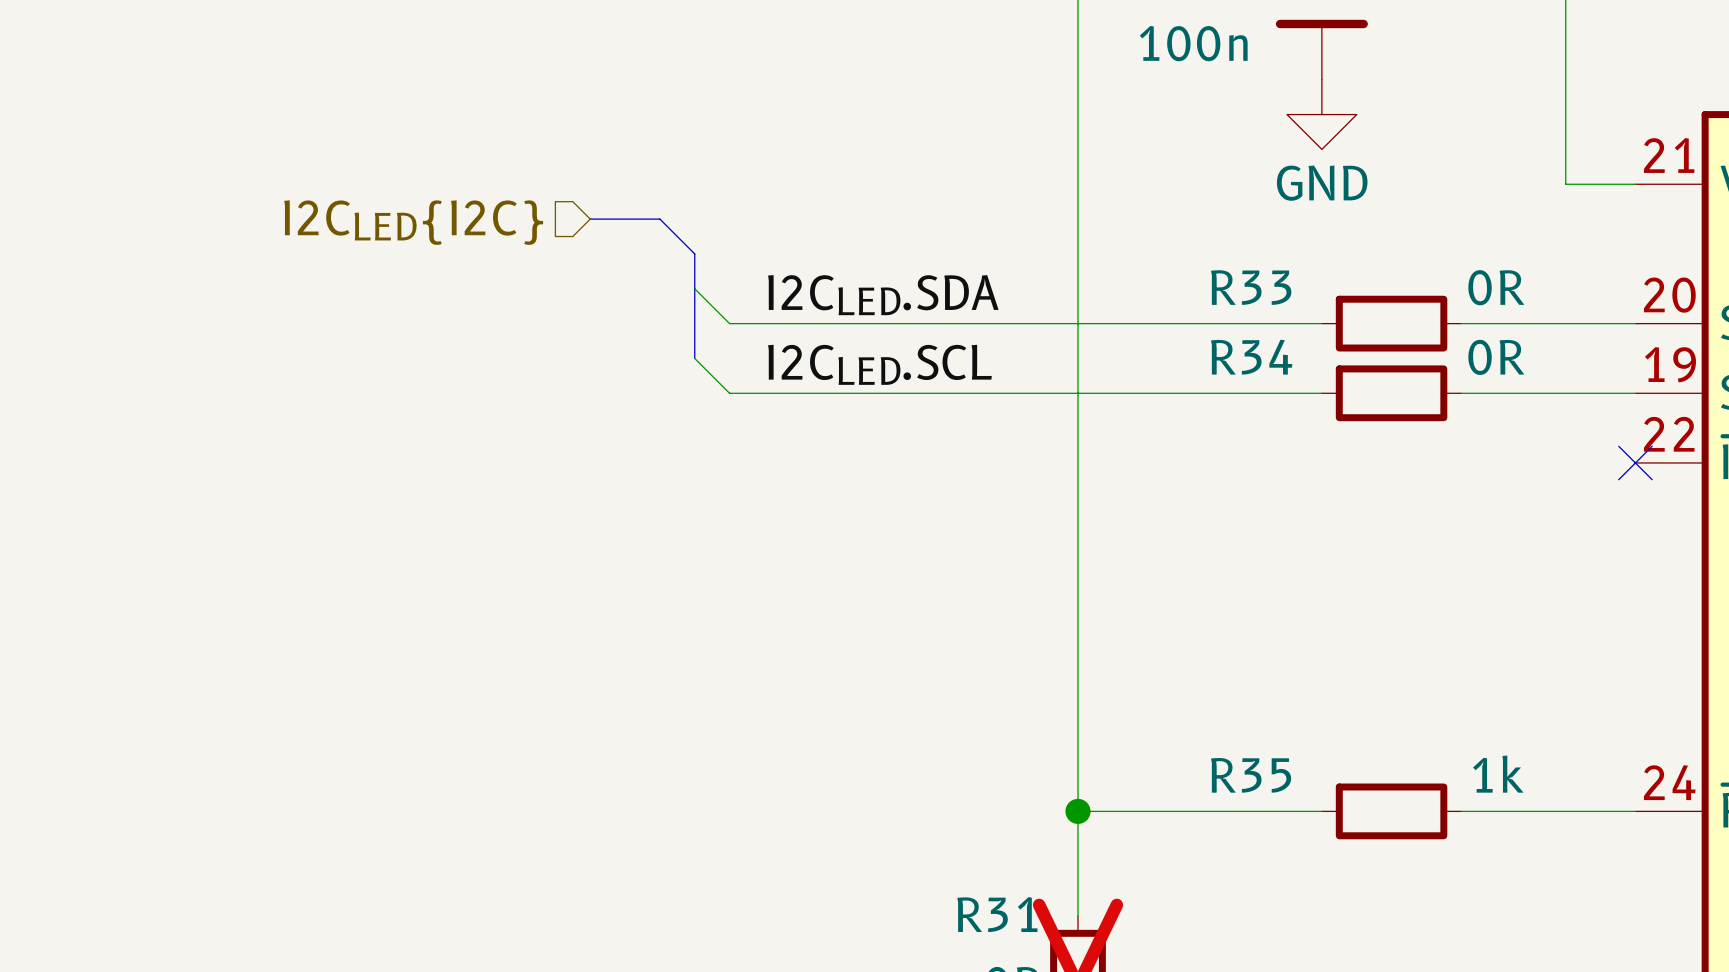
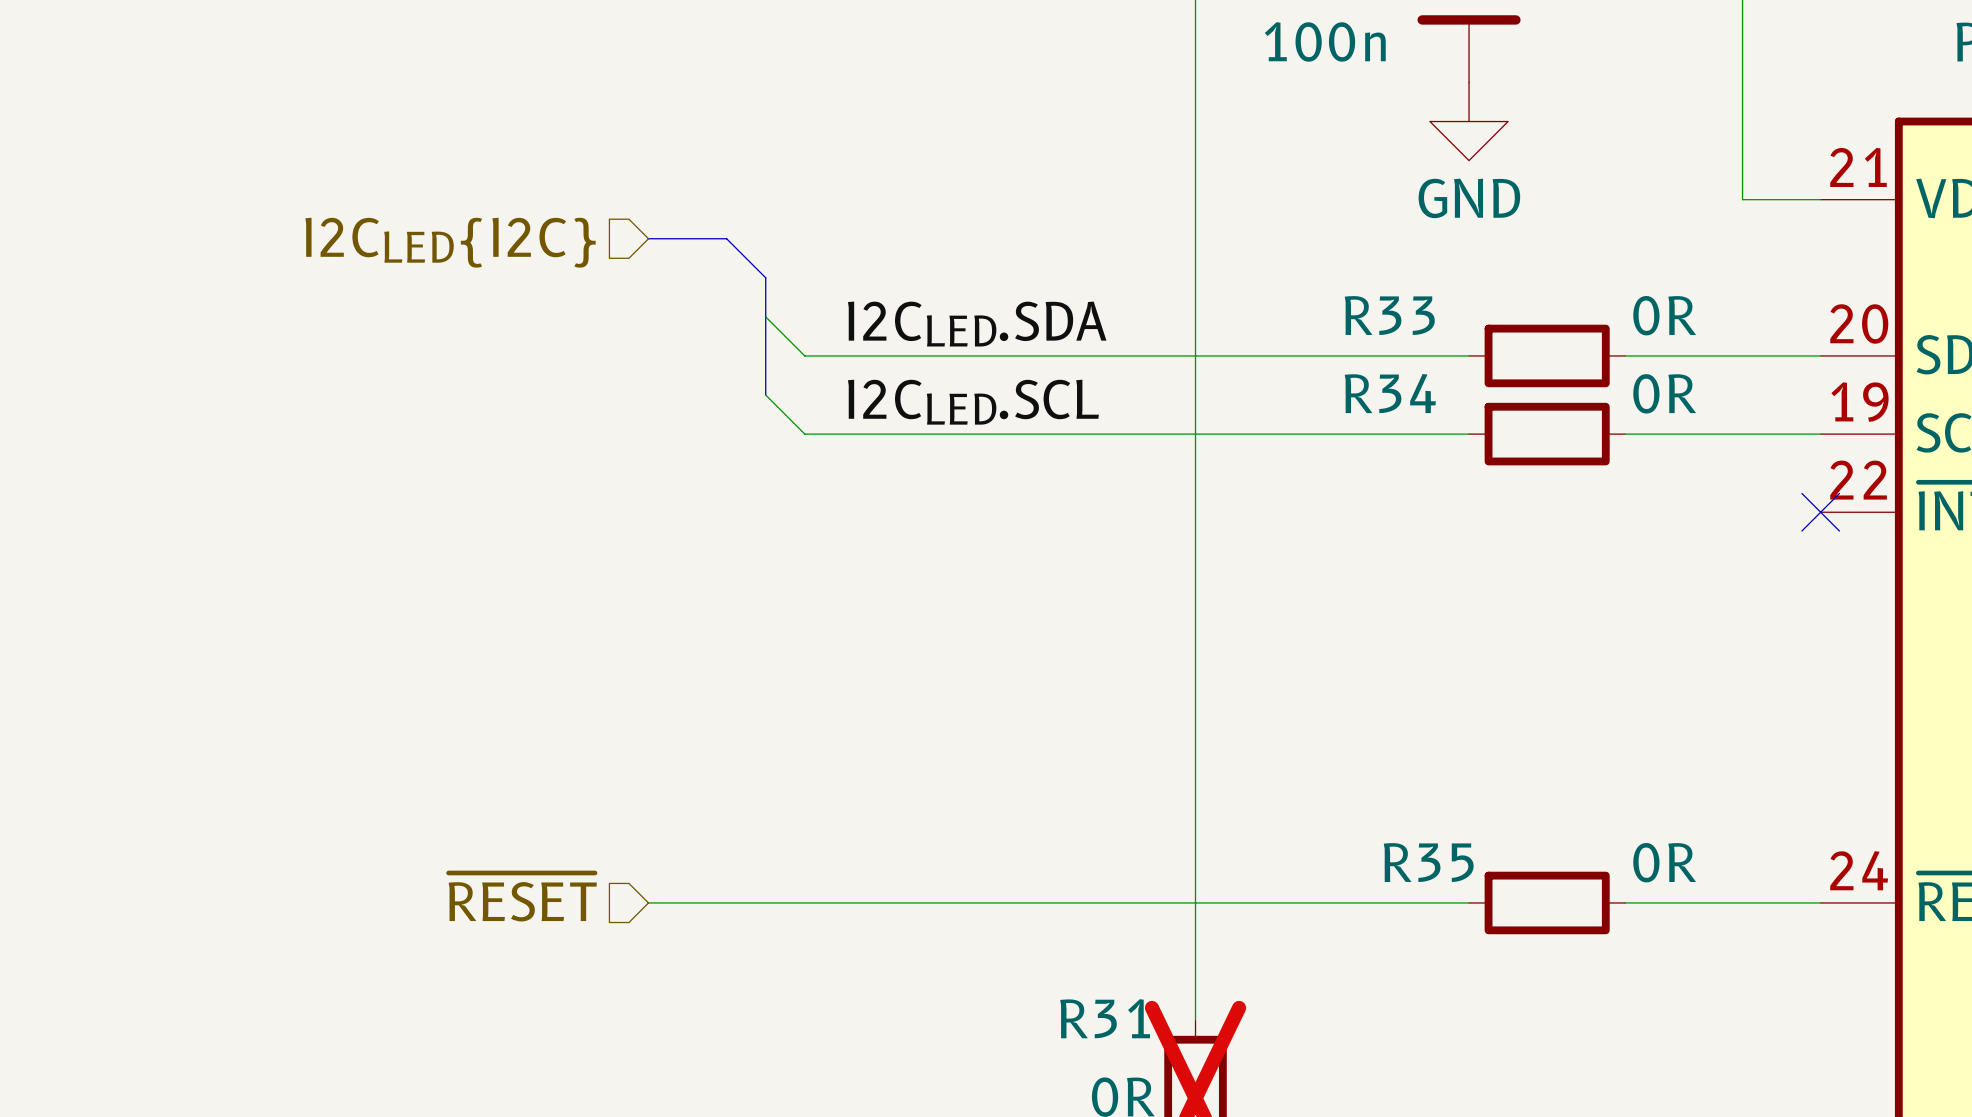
R35 text: 1k (1498, 774) -> 0R (1664, 862)
R35 name position: R35 (1251, 775) -> R35 (1428, 862)
hierarchical label: none -> ~{RESET} (522, 897)
wire: none -> (648, 902) (1195, 902)
junction: (1078, 811) -> none

